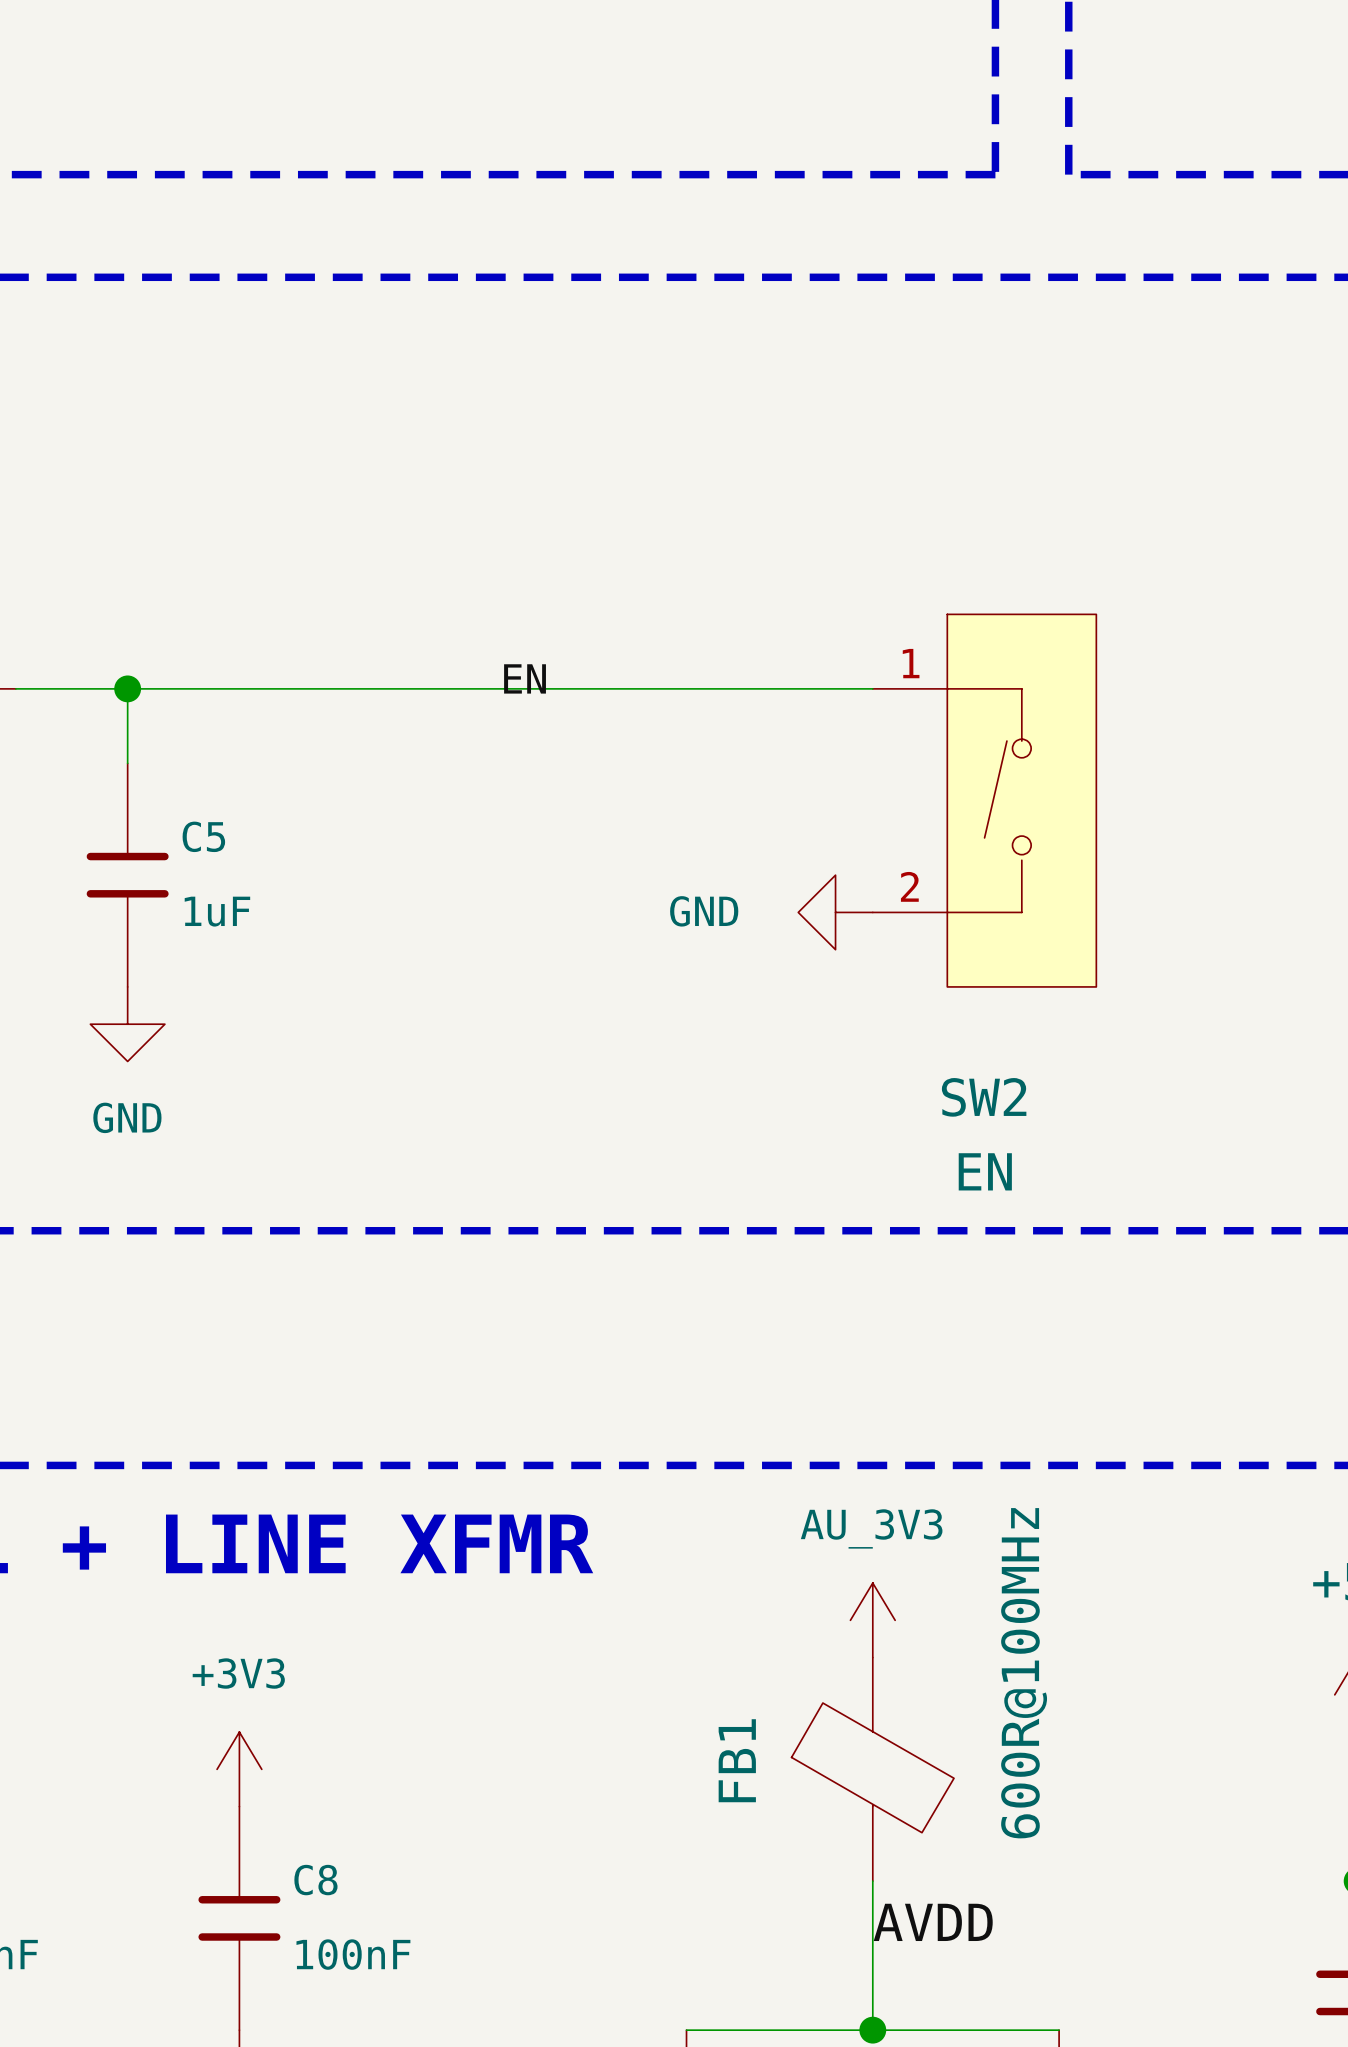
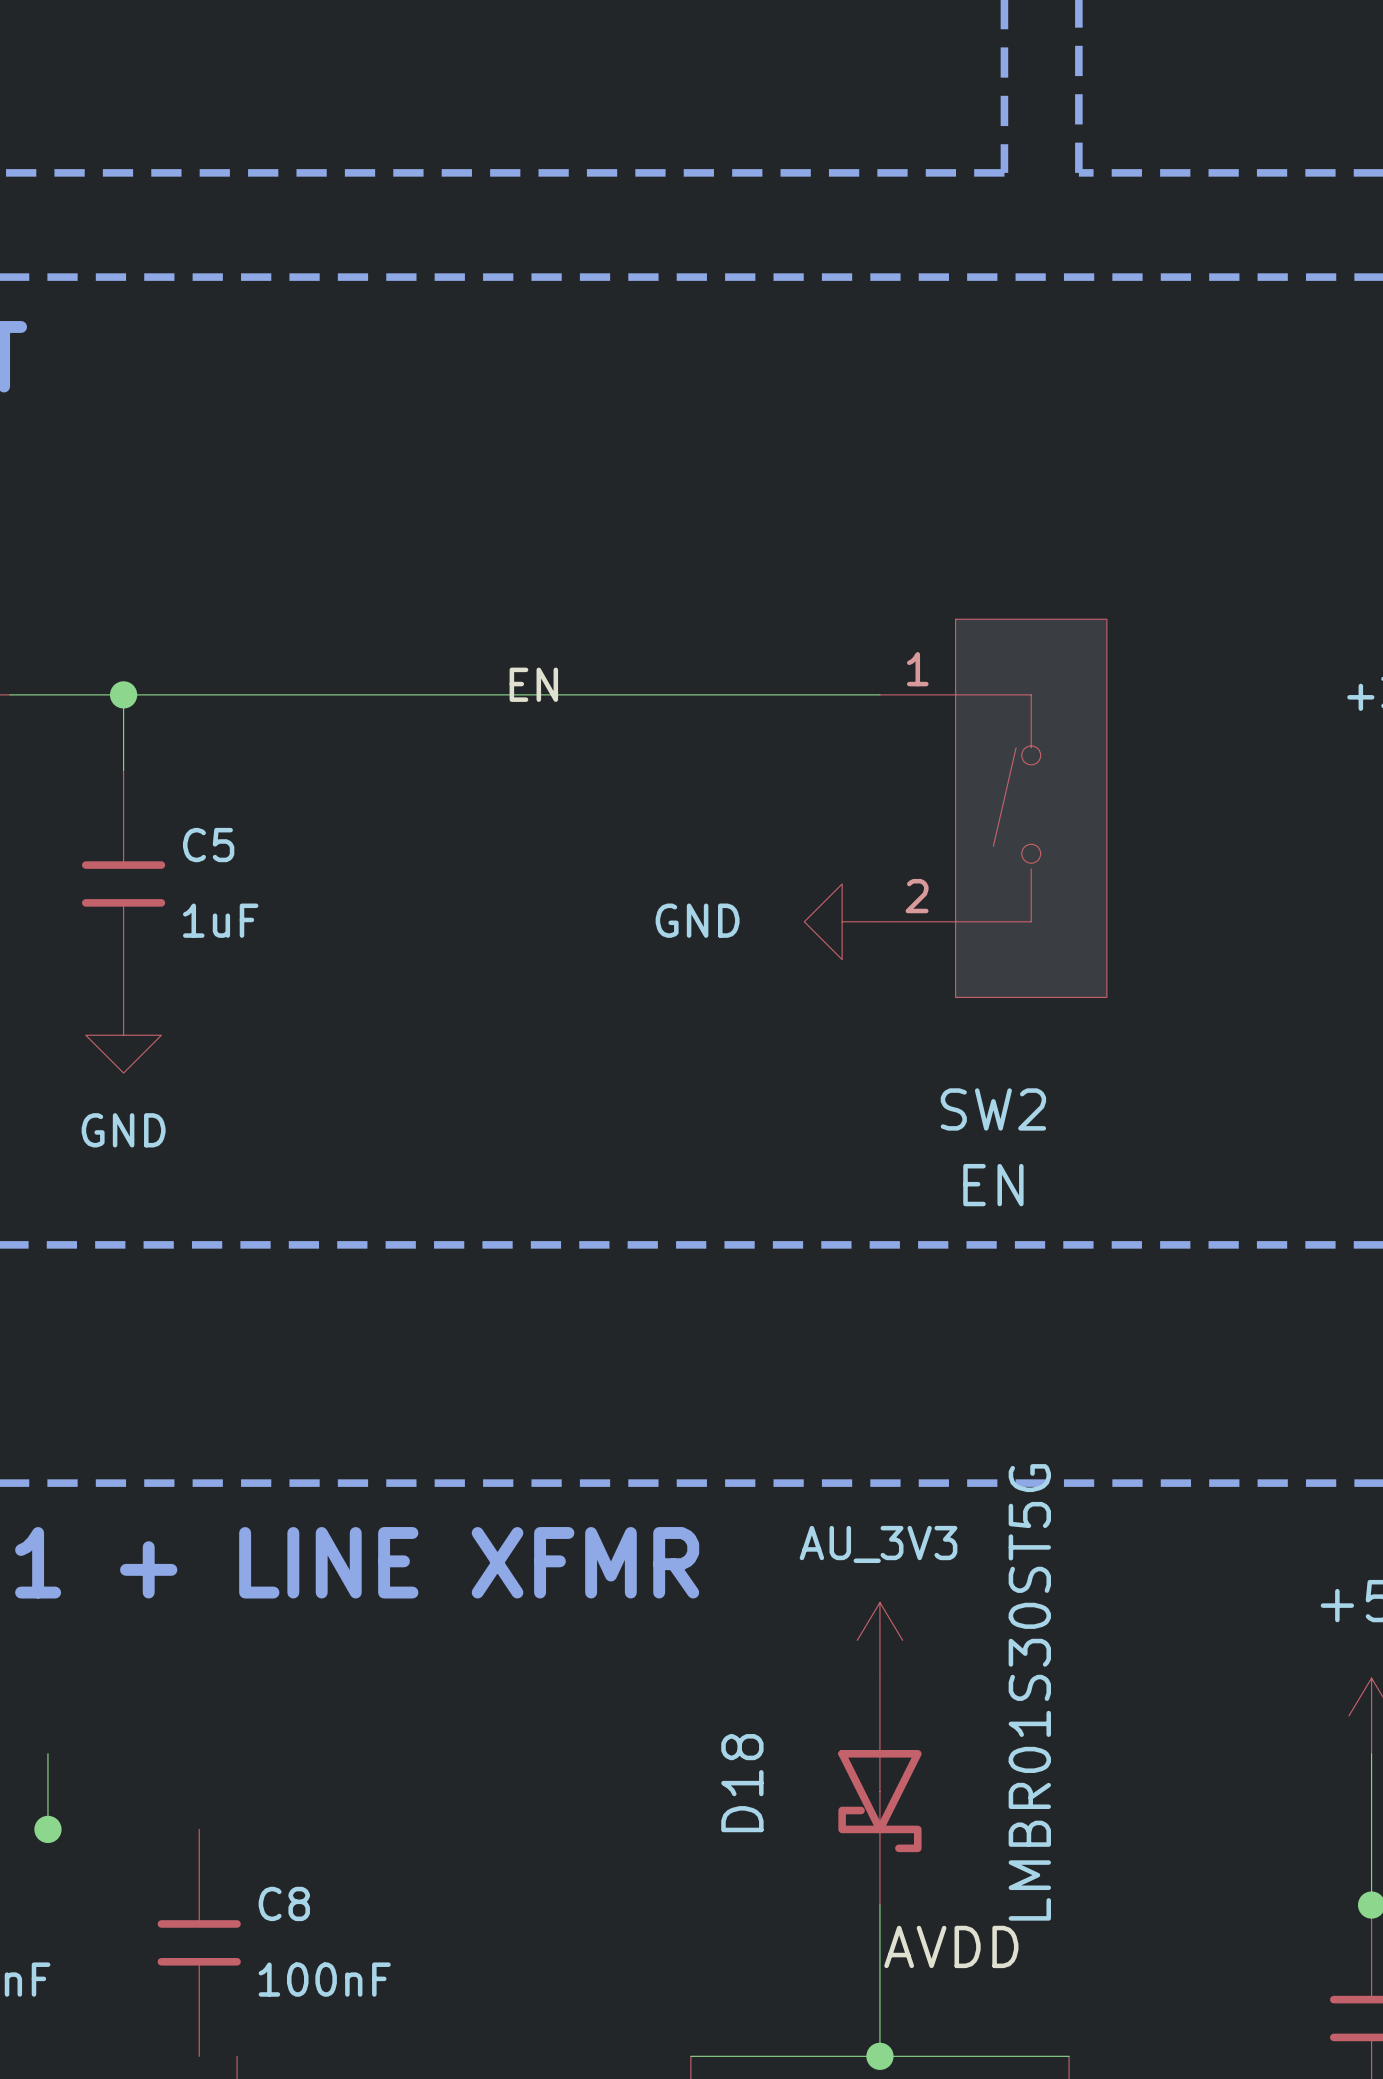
wire: none -> (47, 1753) (47, 1829)
power symbol: +3V3 (239, 1769) -> none
FB1: 600R@100MHz (872, 1769) -> none
D18: none -> LMBR01S30ST5G (879, 1791)
junction: none -> (47, 1829)
C8 position: (239, 1918) -> (199, 1942)

